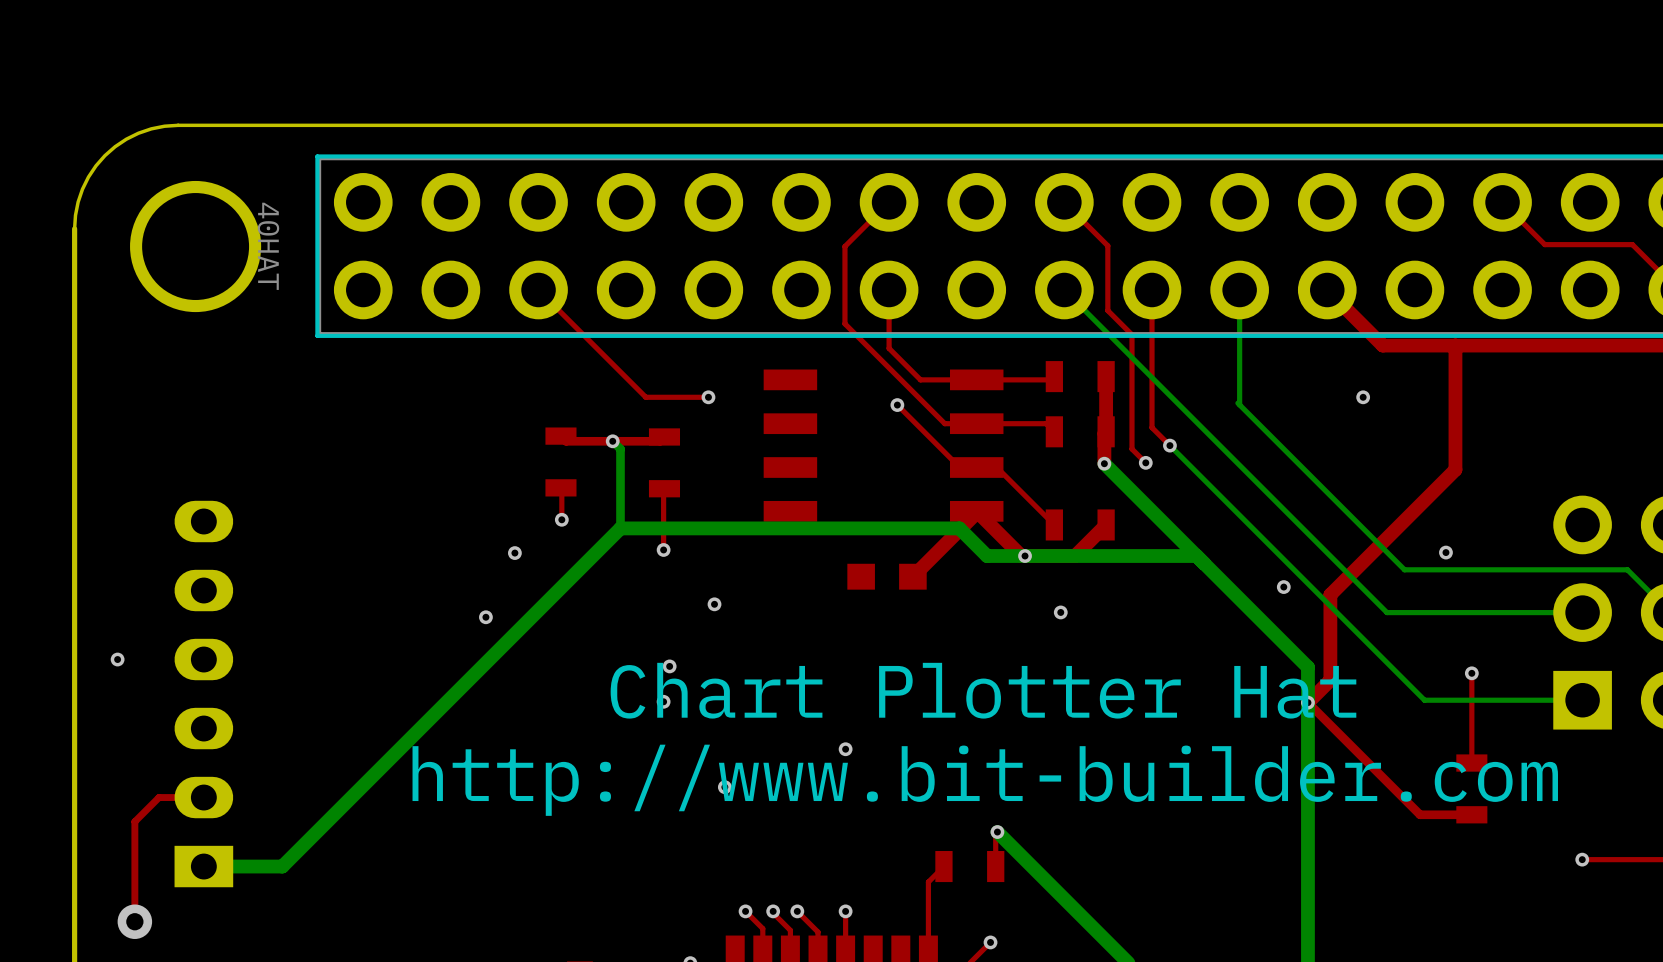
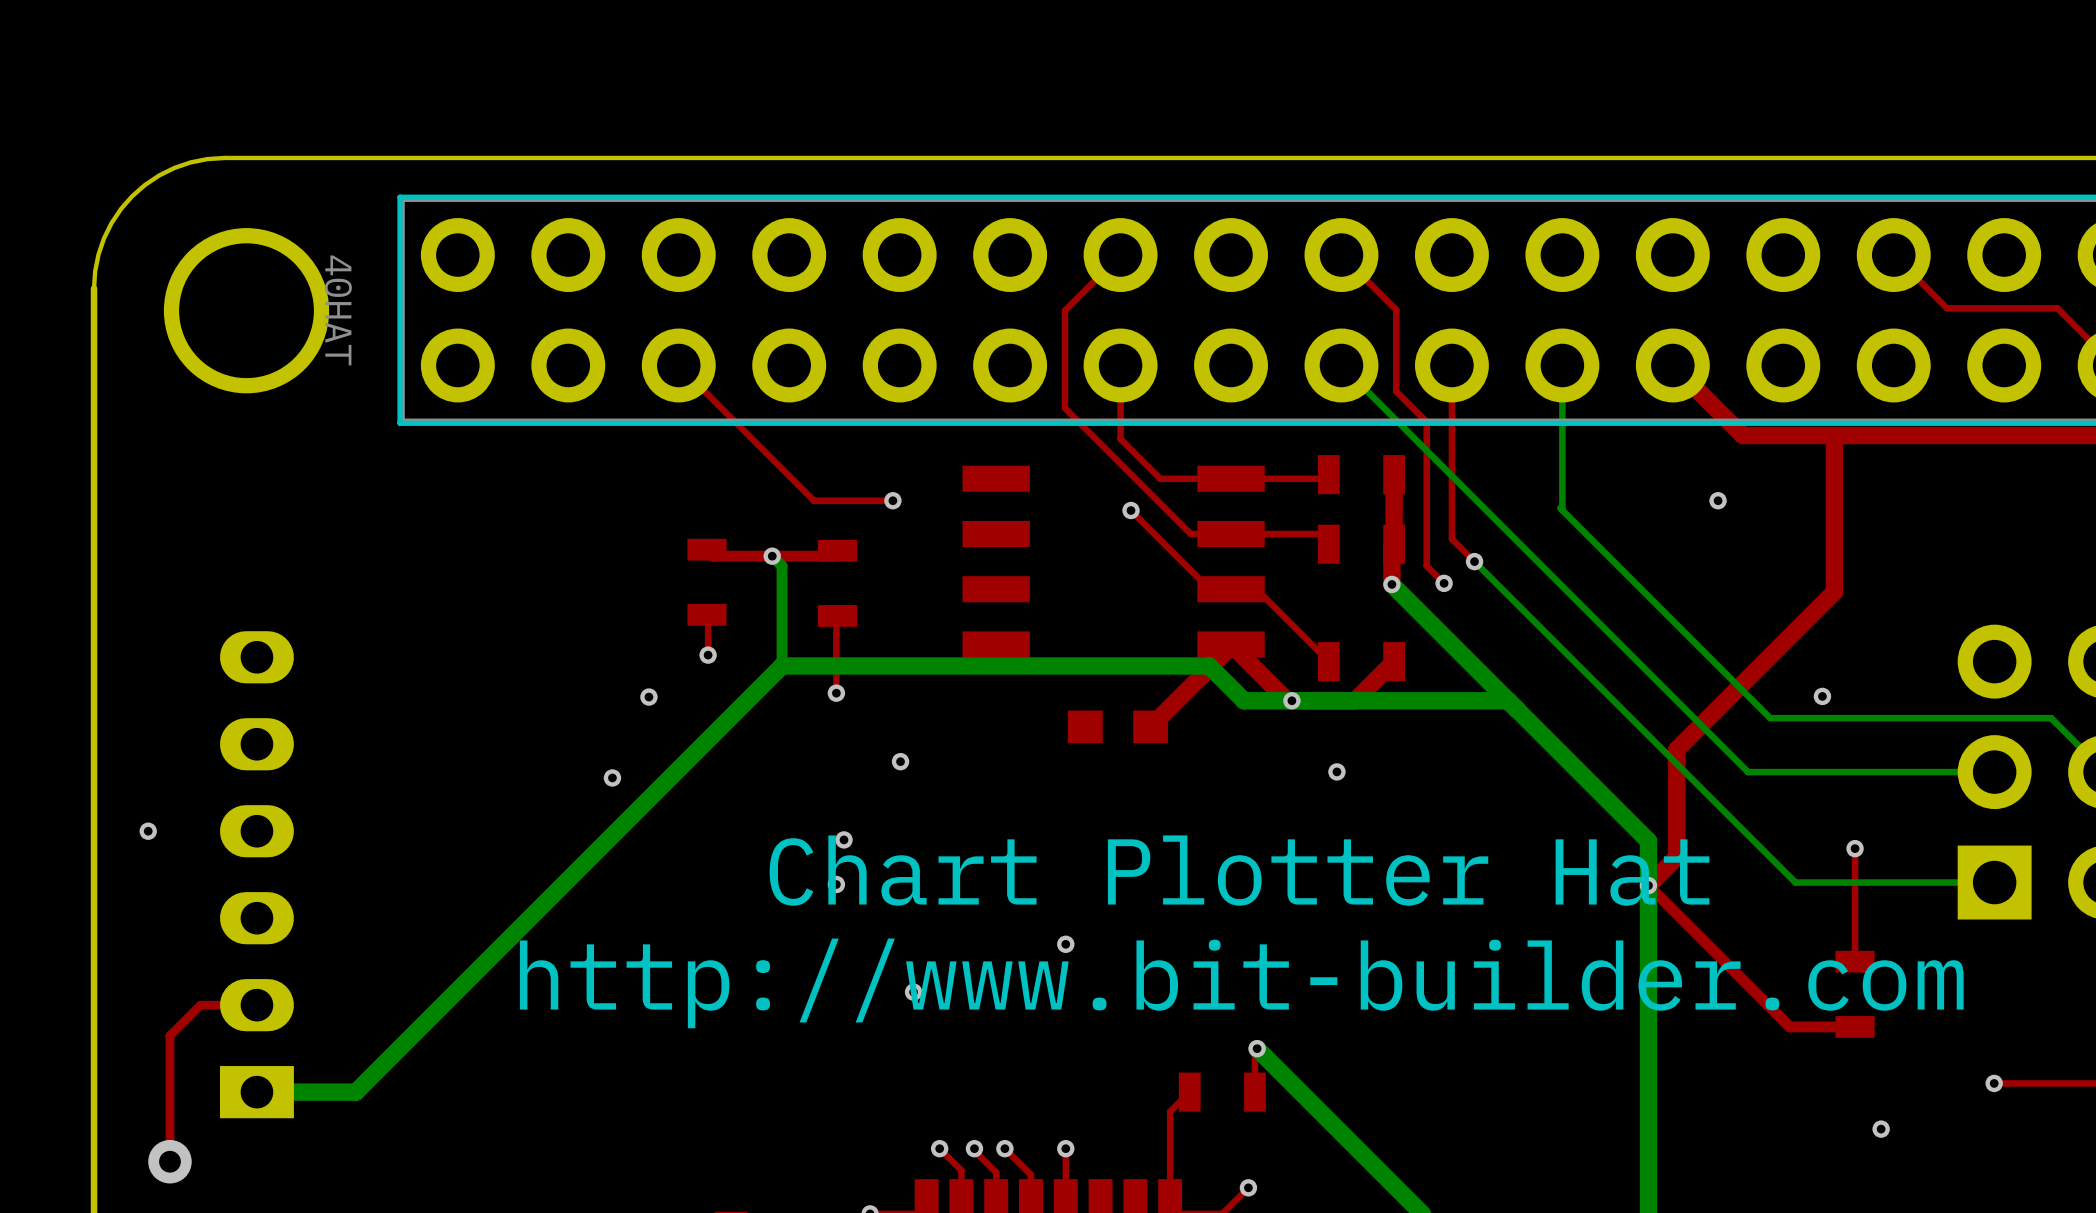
via: (1283, 587) -> none
via: none -> (1881, 1129)

